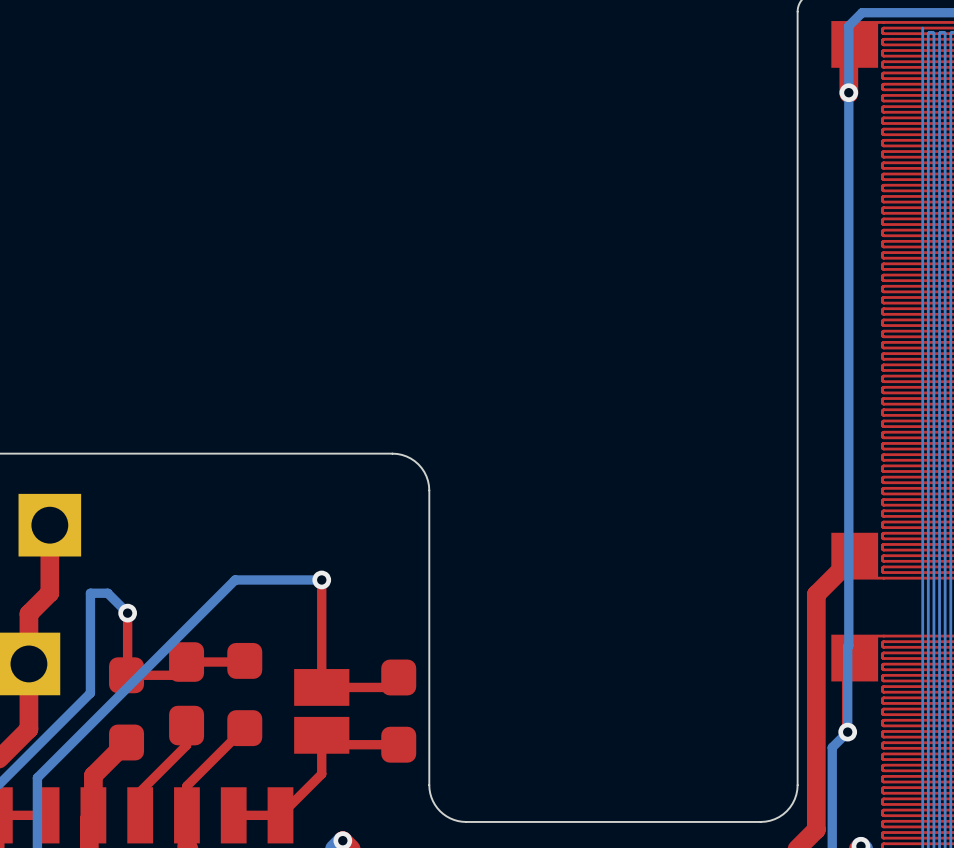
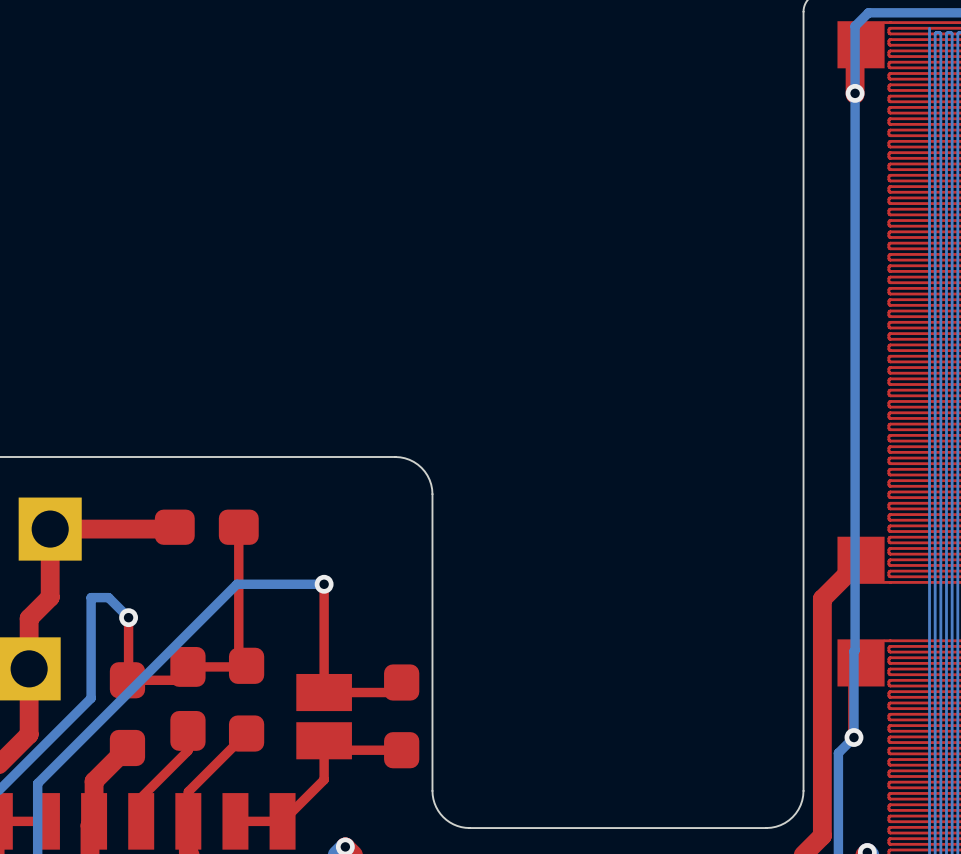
top track: none -> (174, 527) (172, 529) (50, 529)
part: none -> (206, 527)
top track: none -> (238, 527) (238, 658) (246, 665)

